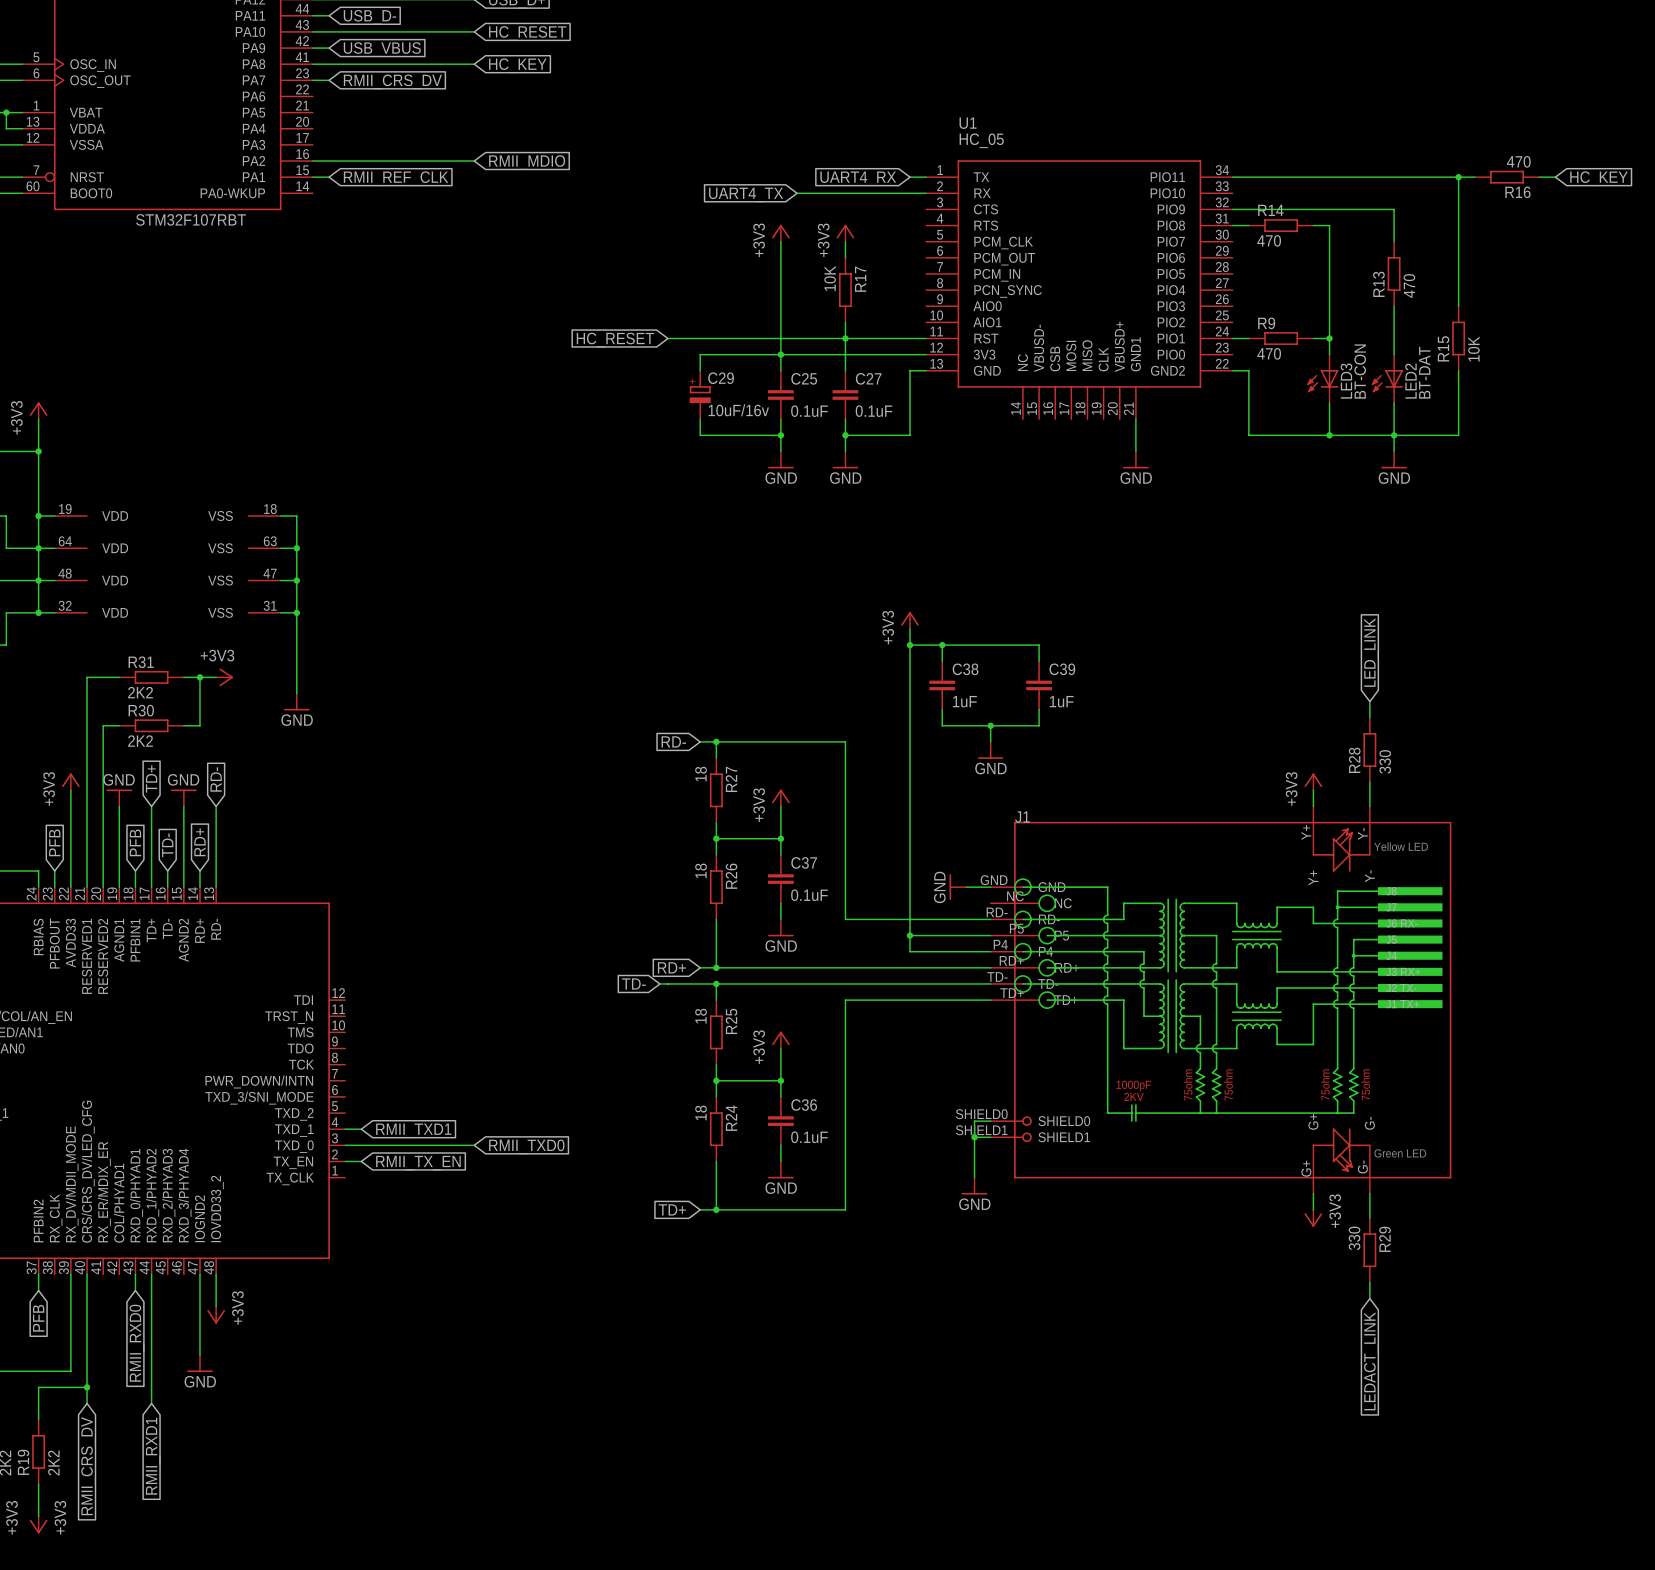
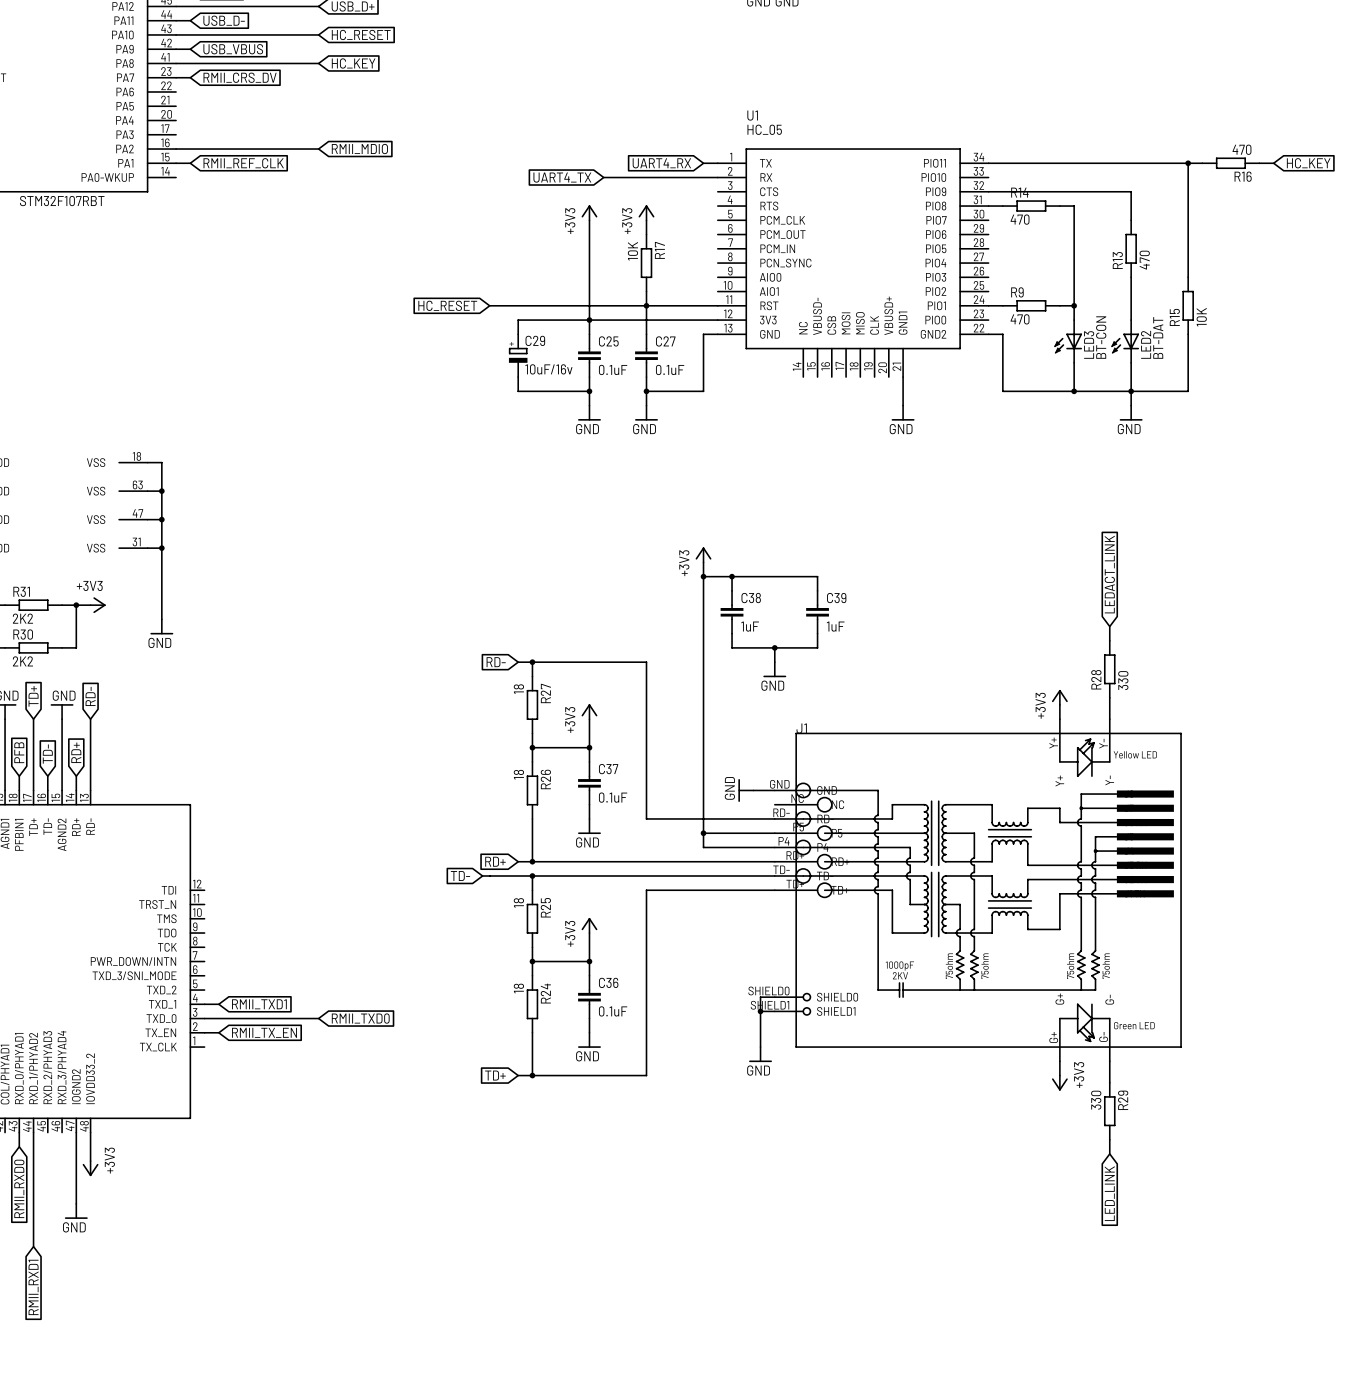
global label: LED_LINK (1371, 652) -> LEDACT_LINK (1109, 574)
global label: LEDACT_LINK (1371, 1361) -> LED_LINK (1109, 1193)

